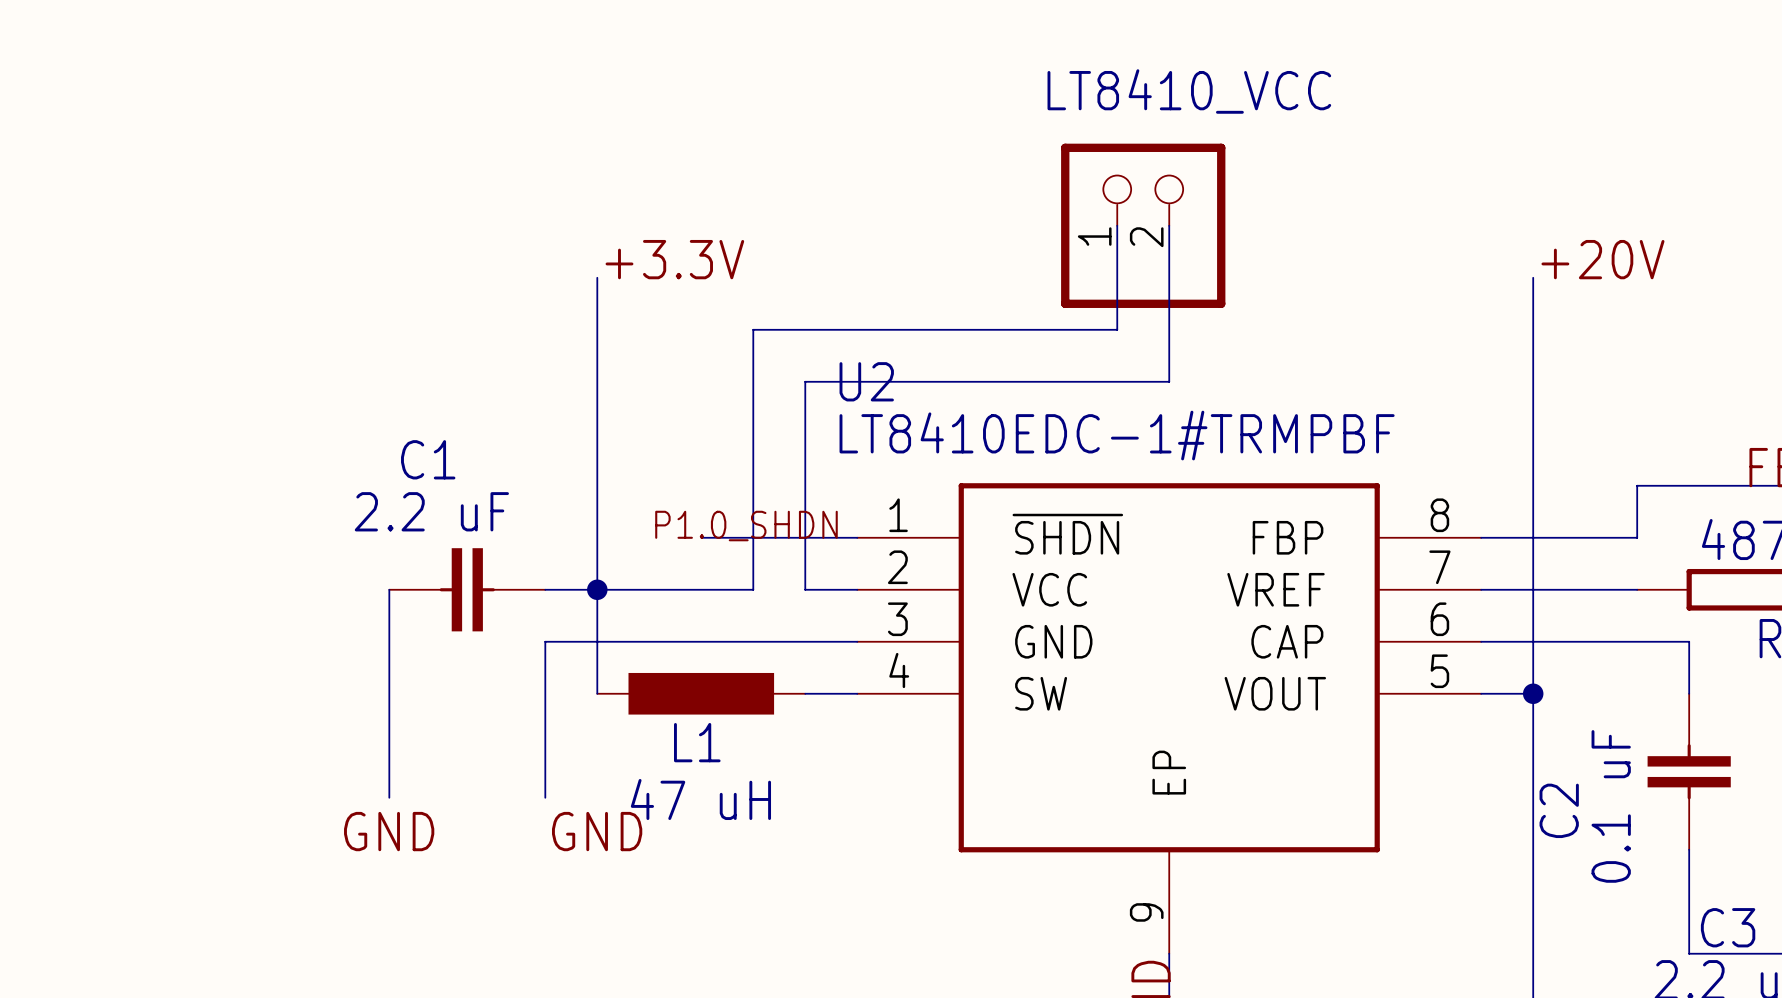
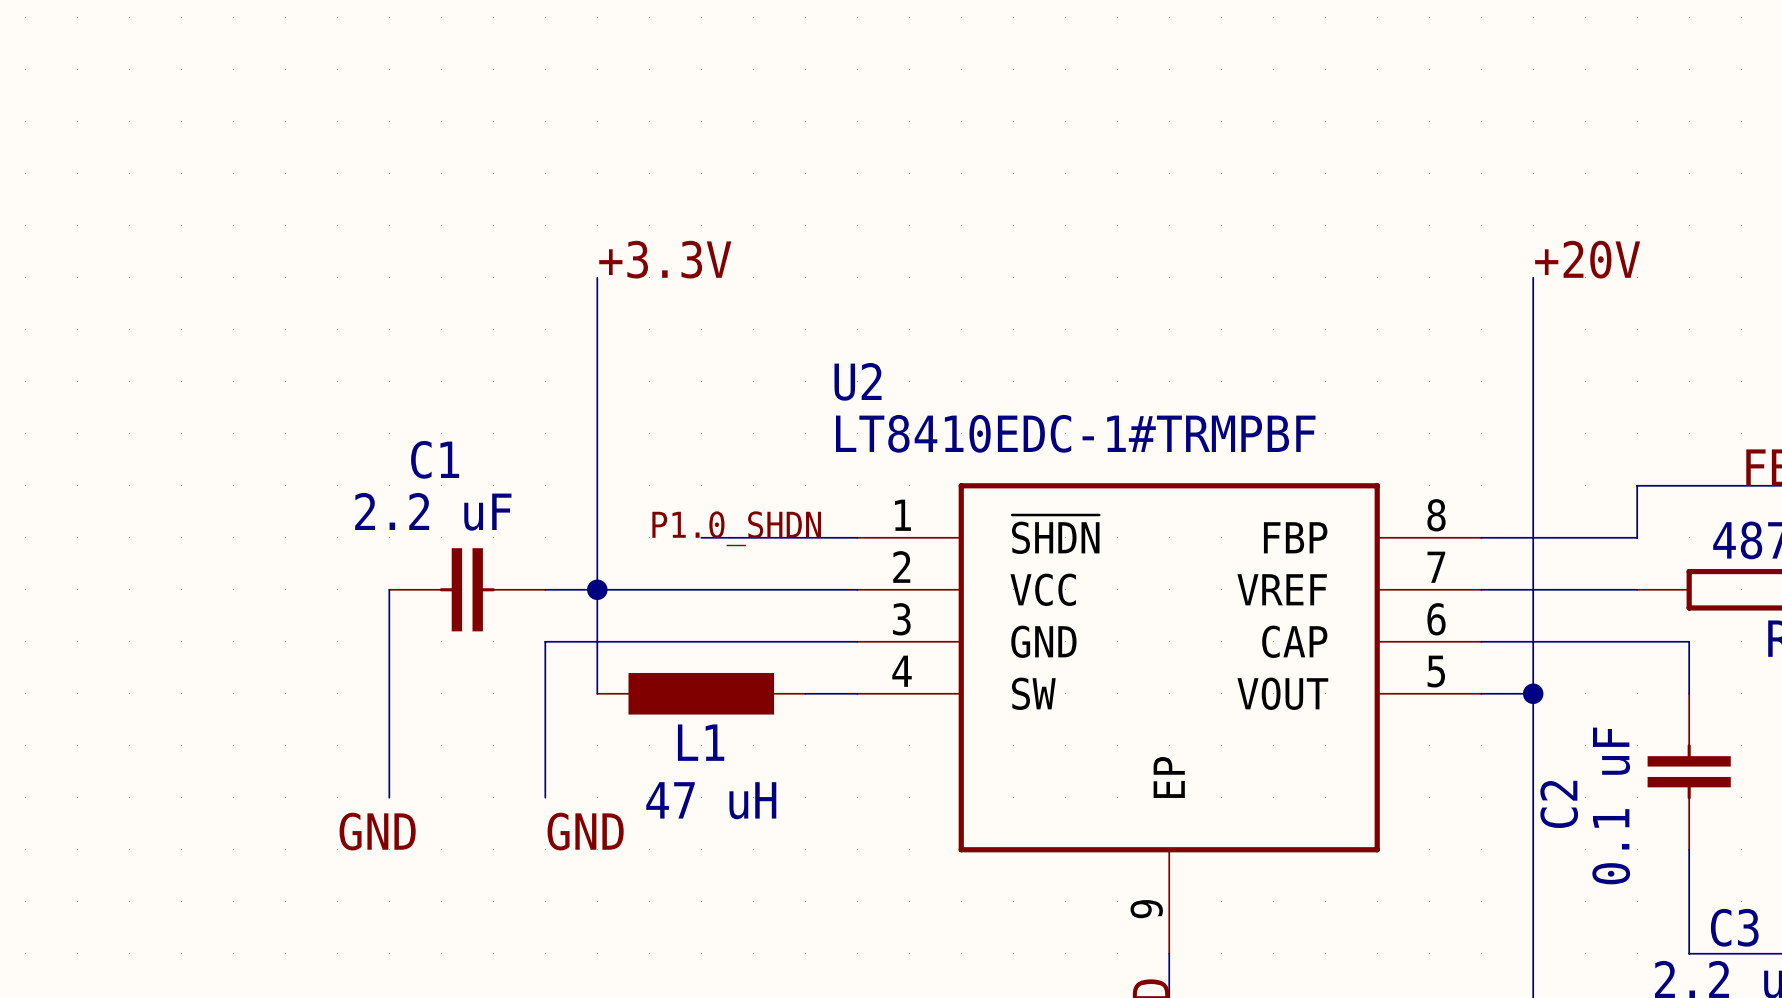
wire: (1117, 225) (1117, 329) (753, 329) (753, 589) -> (805, 589) (753, 589)
LT8410_VCC: (1143, 225) -> none
wire: (1169, 225) (1169, 381) (805, 381) (805, 589) -> none

